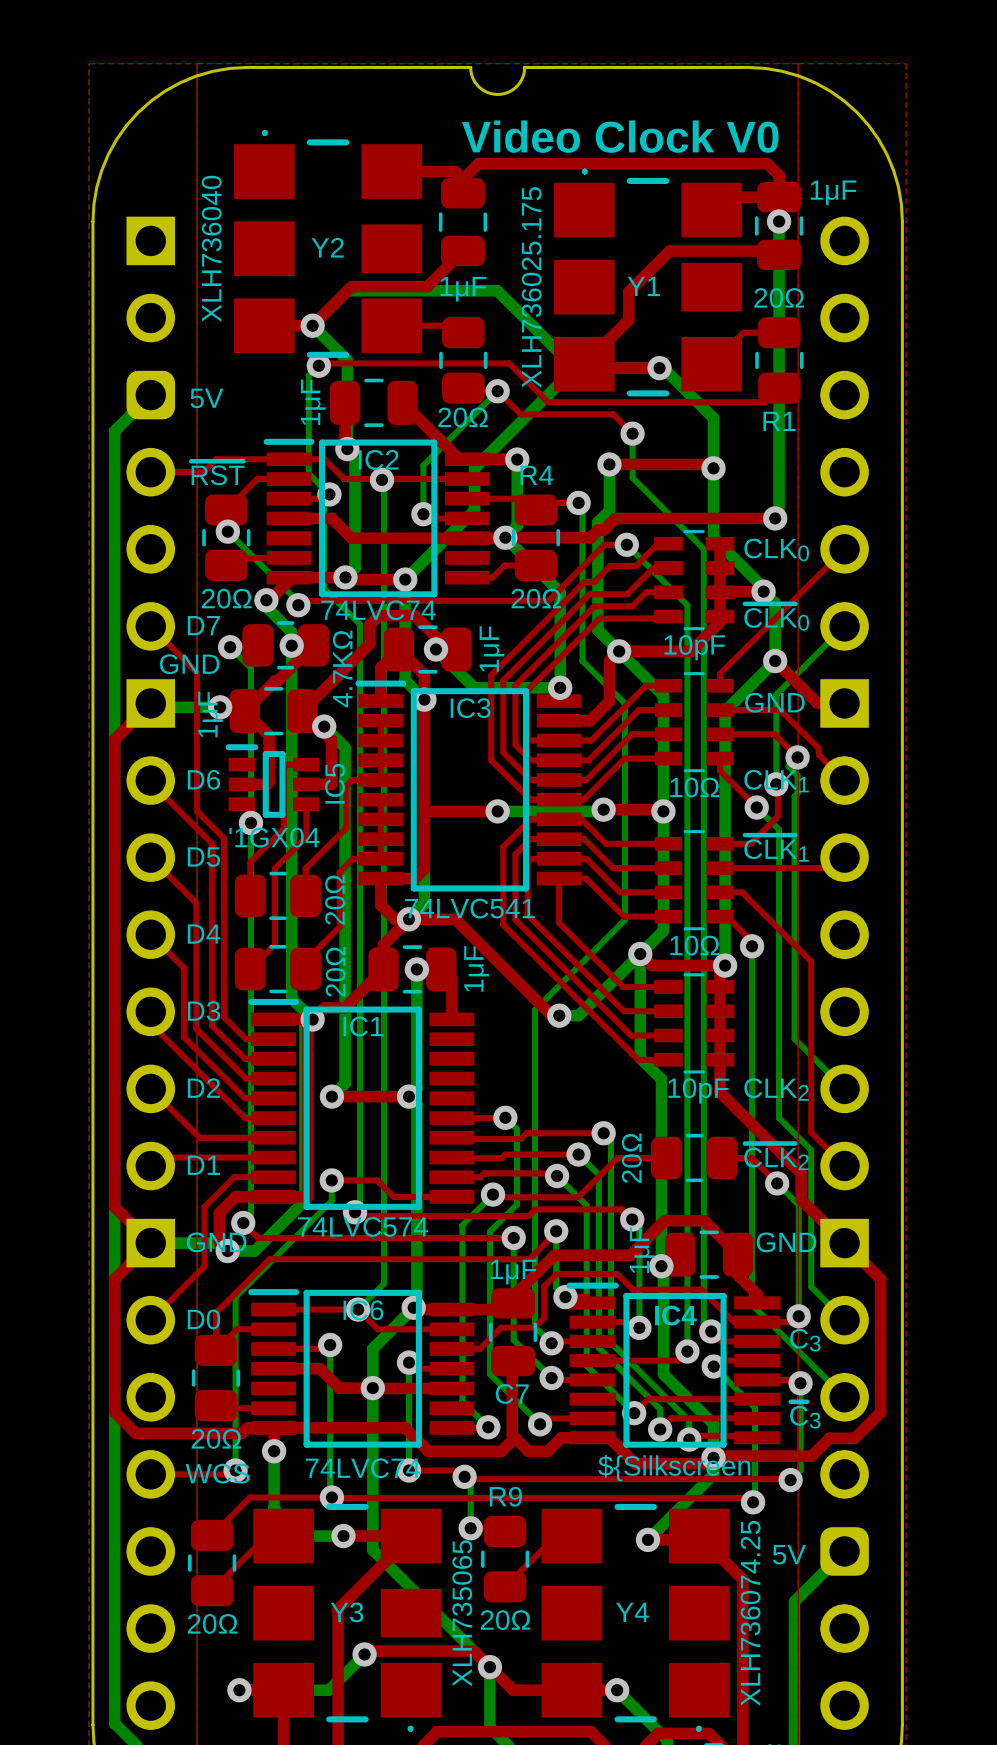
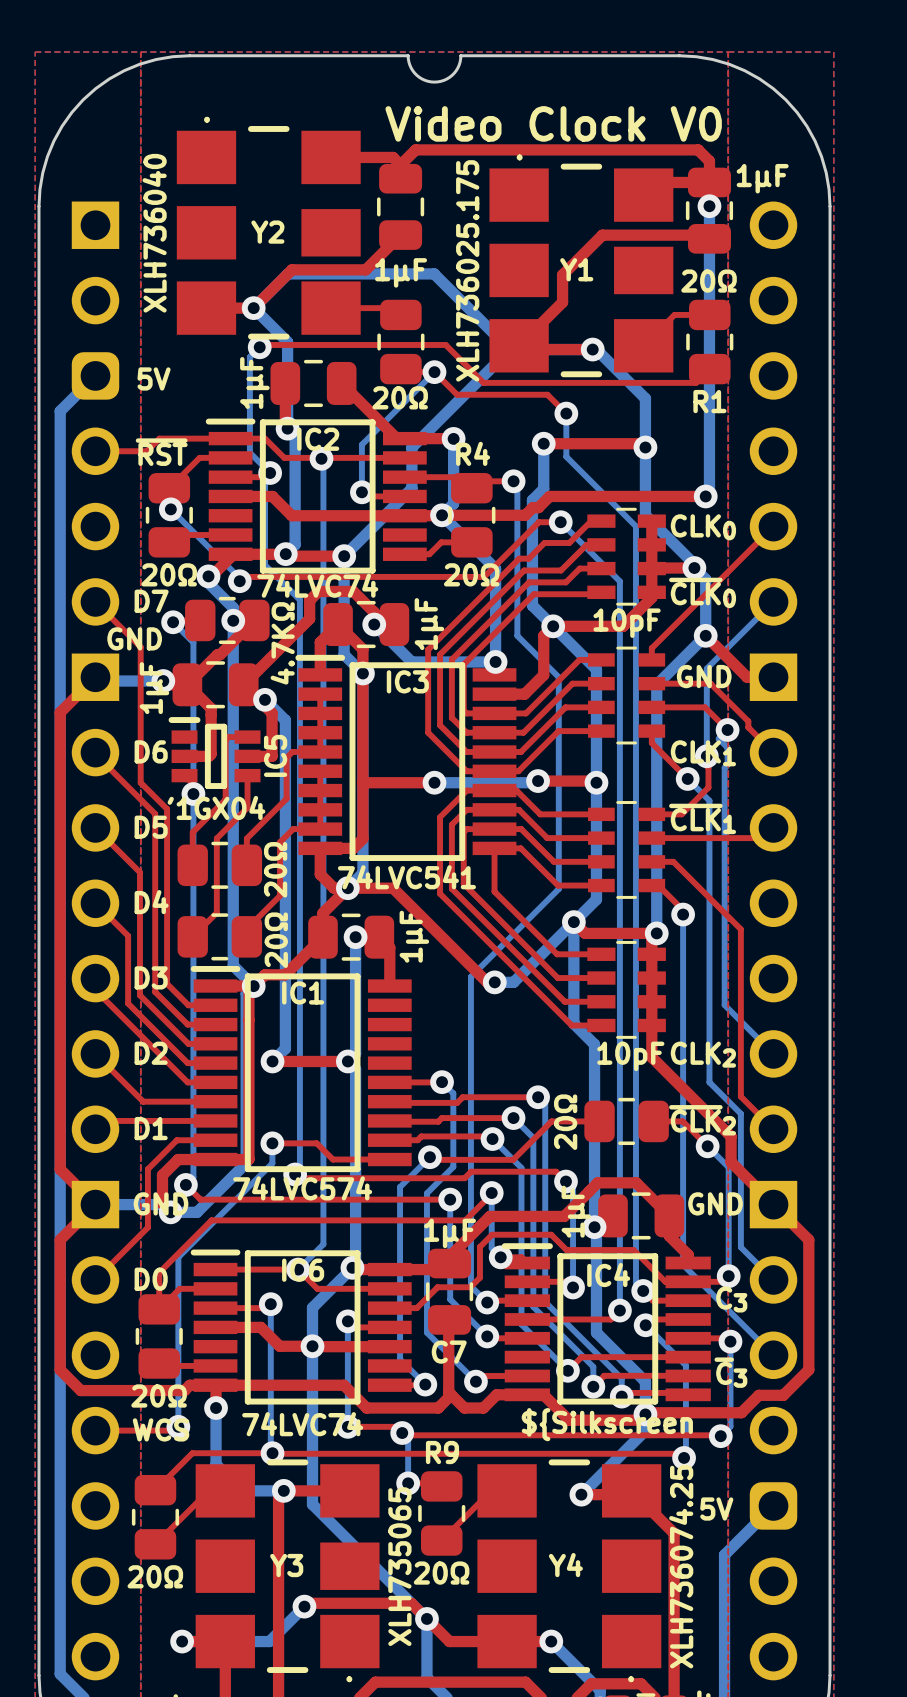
part text: 10Ω (694, 787) -> none
part text: 10Ω (694, 945) -> none
top track: (411, 1536) (338, 1609) -> (283, 1490) (278, 1496) (278, 1562)

